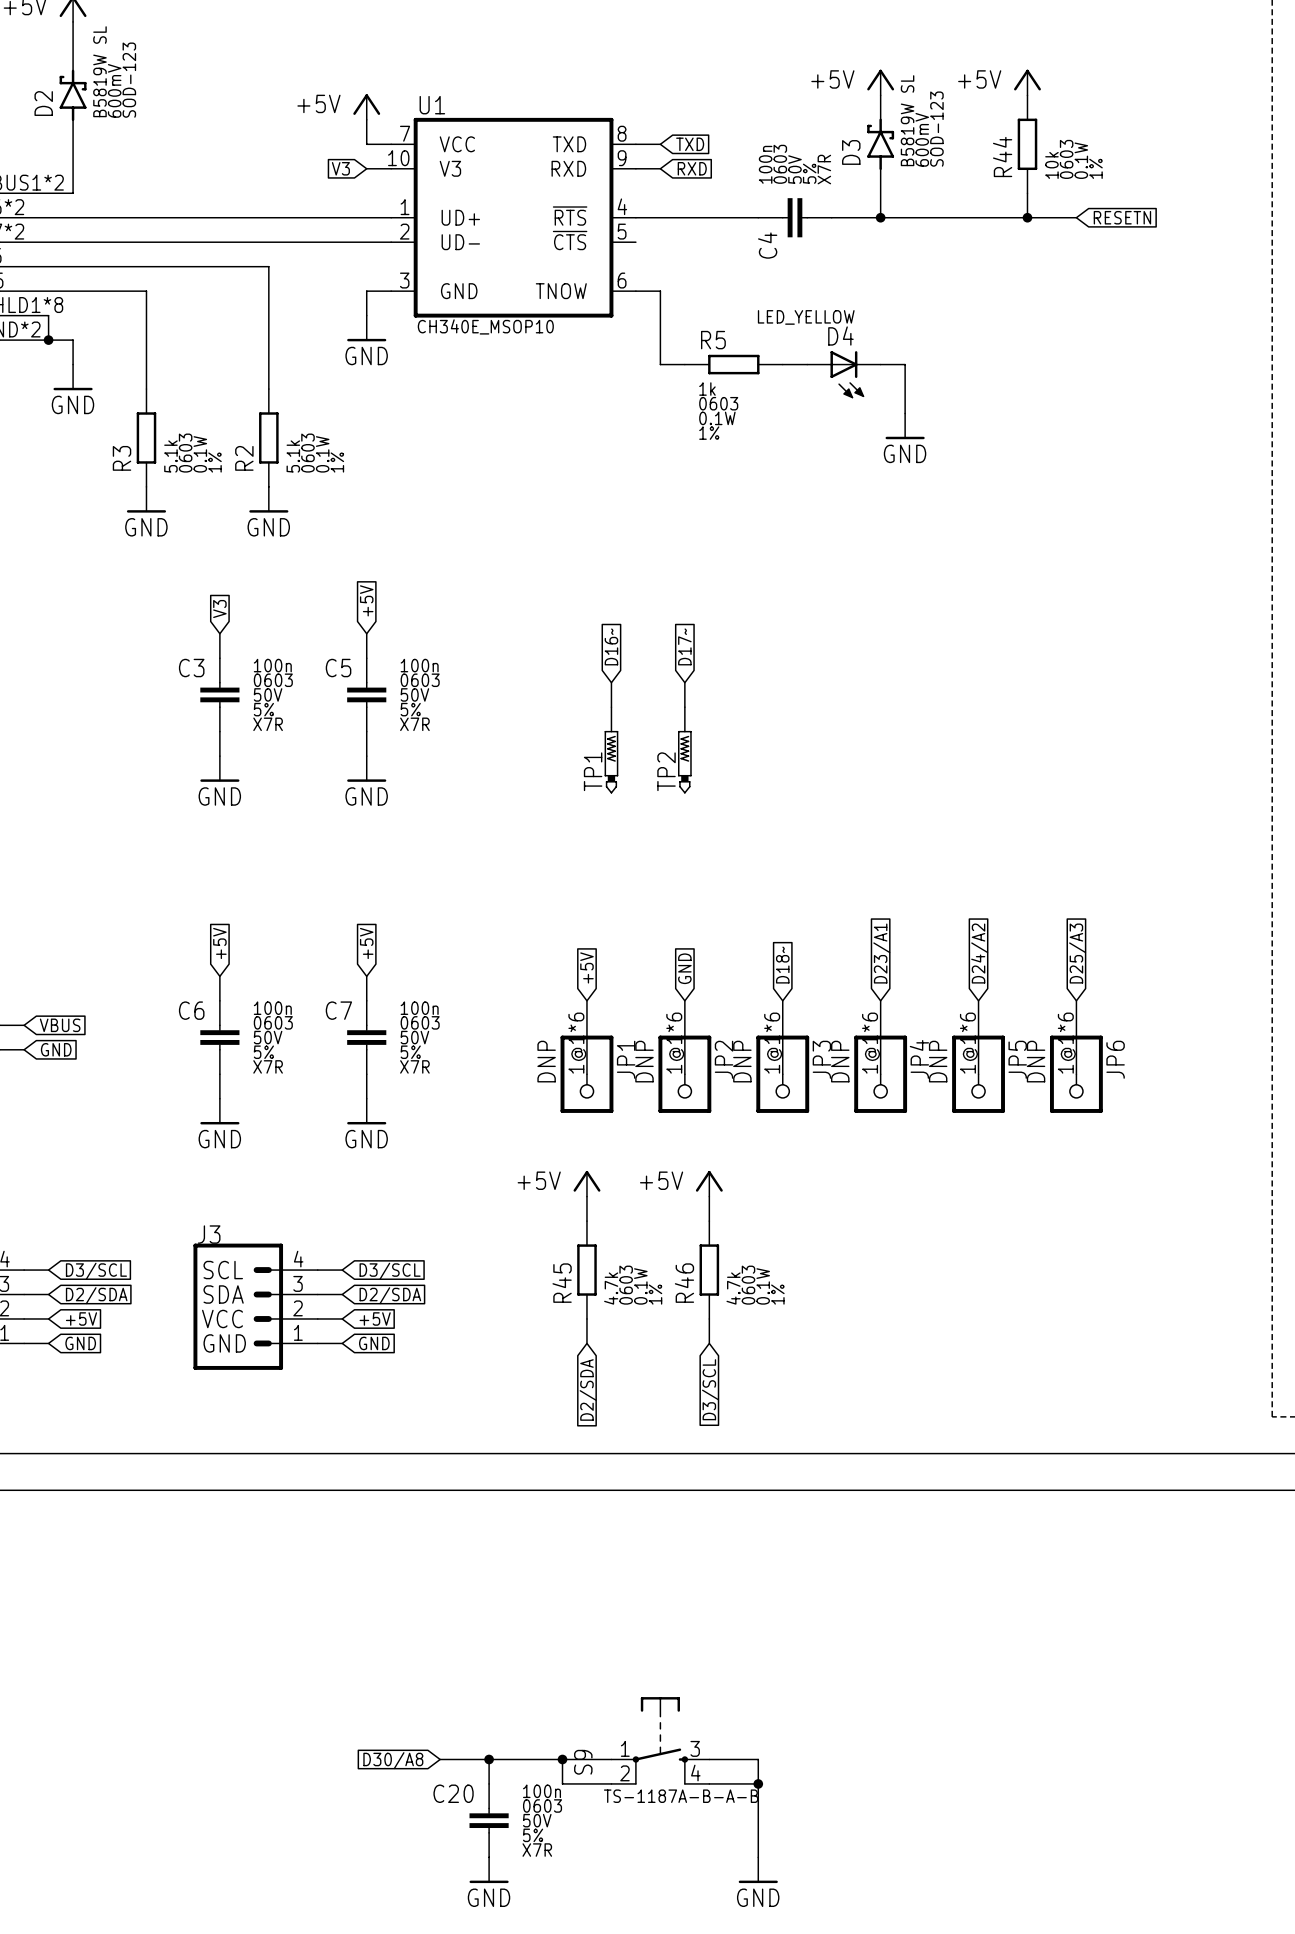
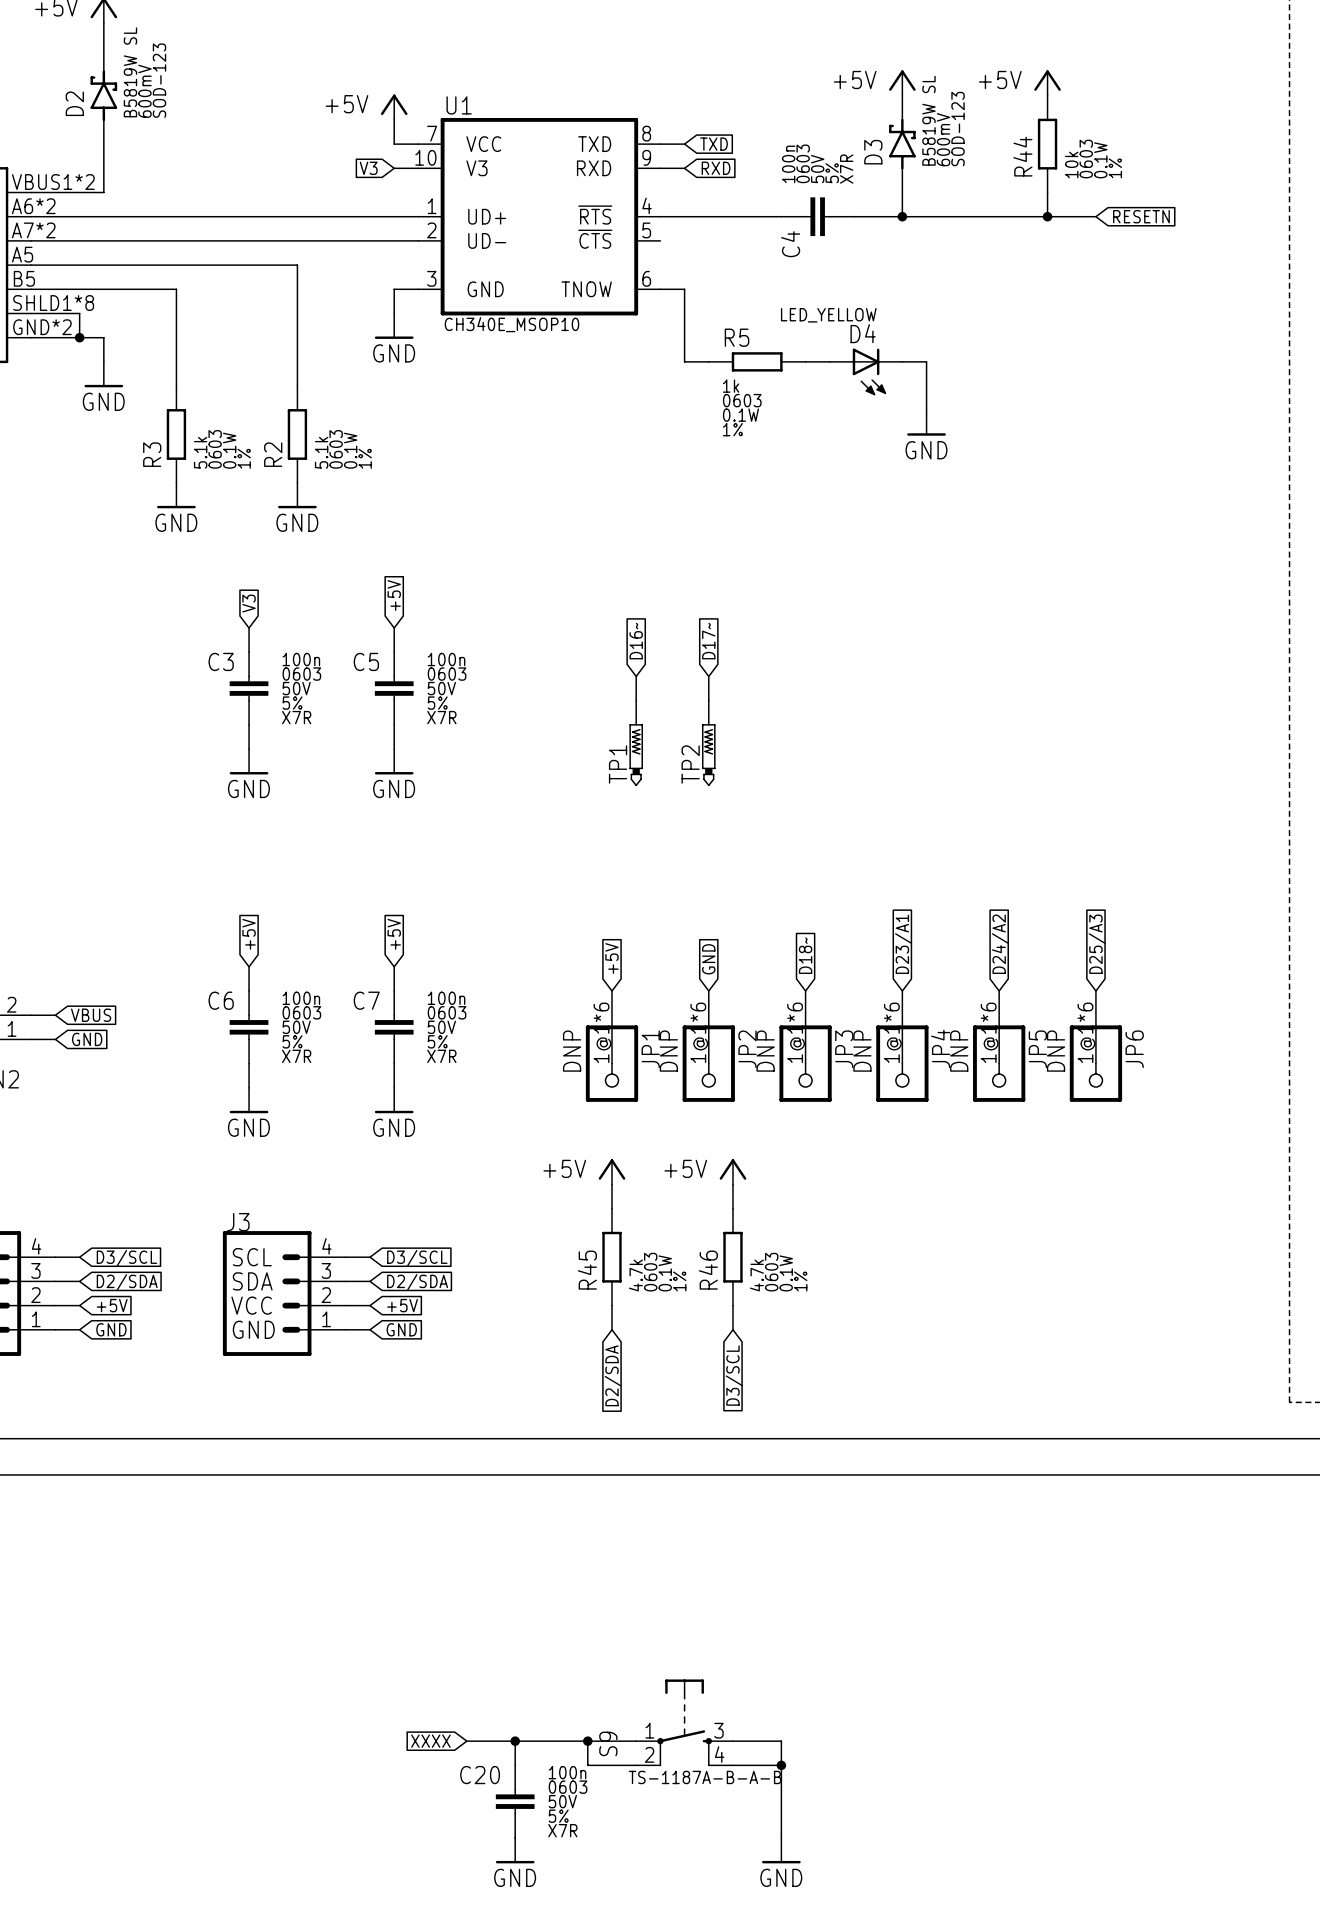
global label: D30/A8 (393, 1760) -> XXXX (430, 1741)

